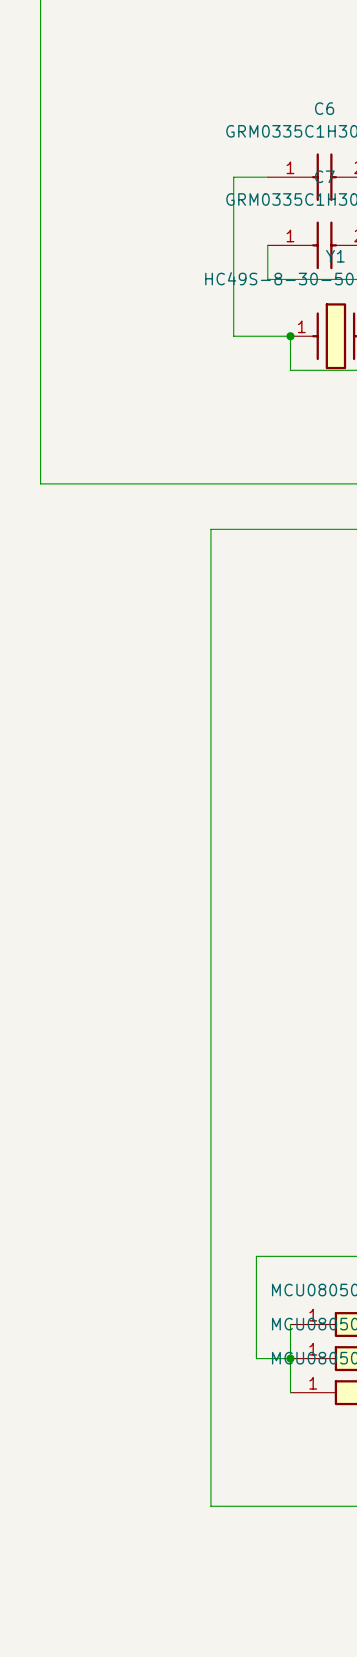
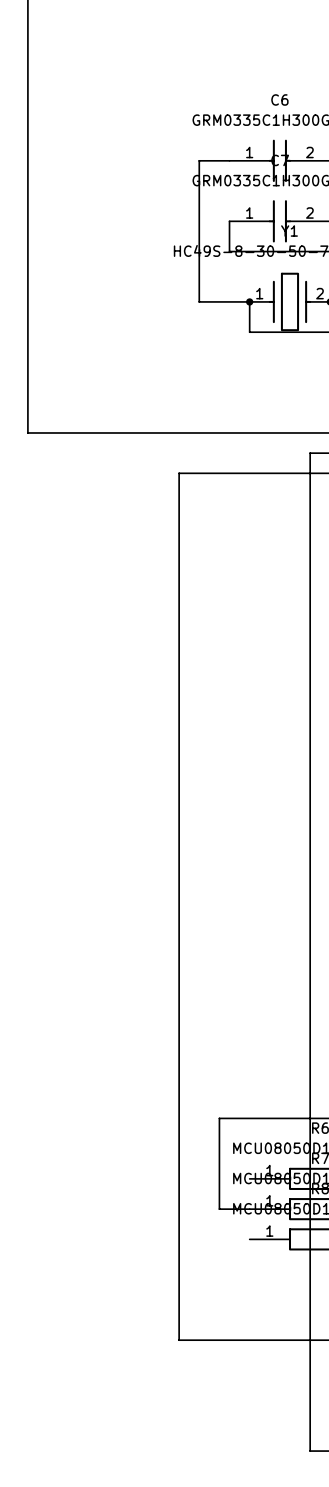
wire: (290, 1324) (290, 1392) -> none
junction: (290, 1358) -> none

